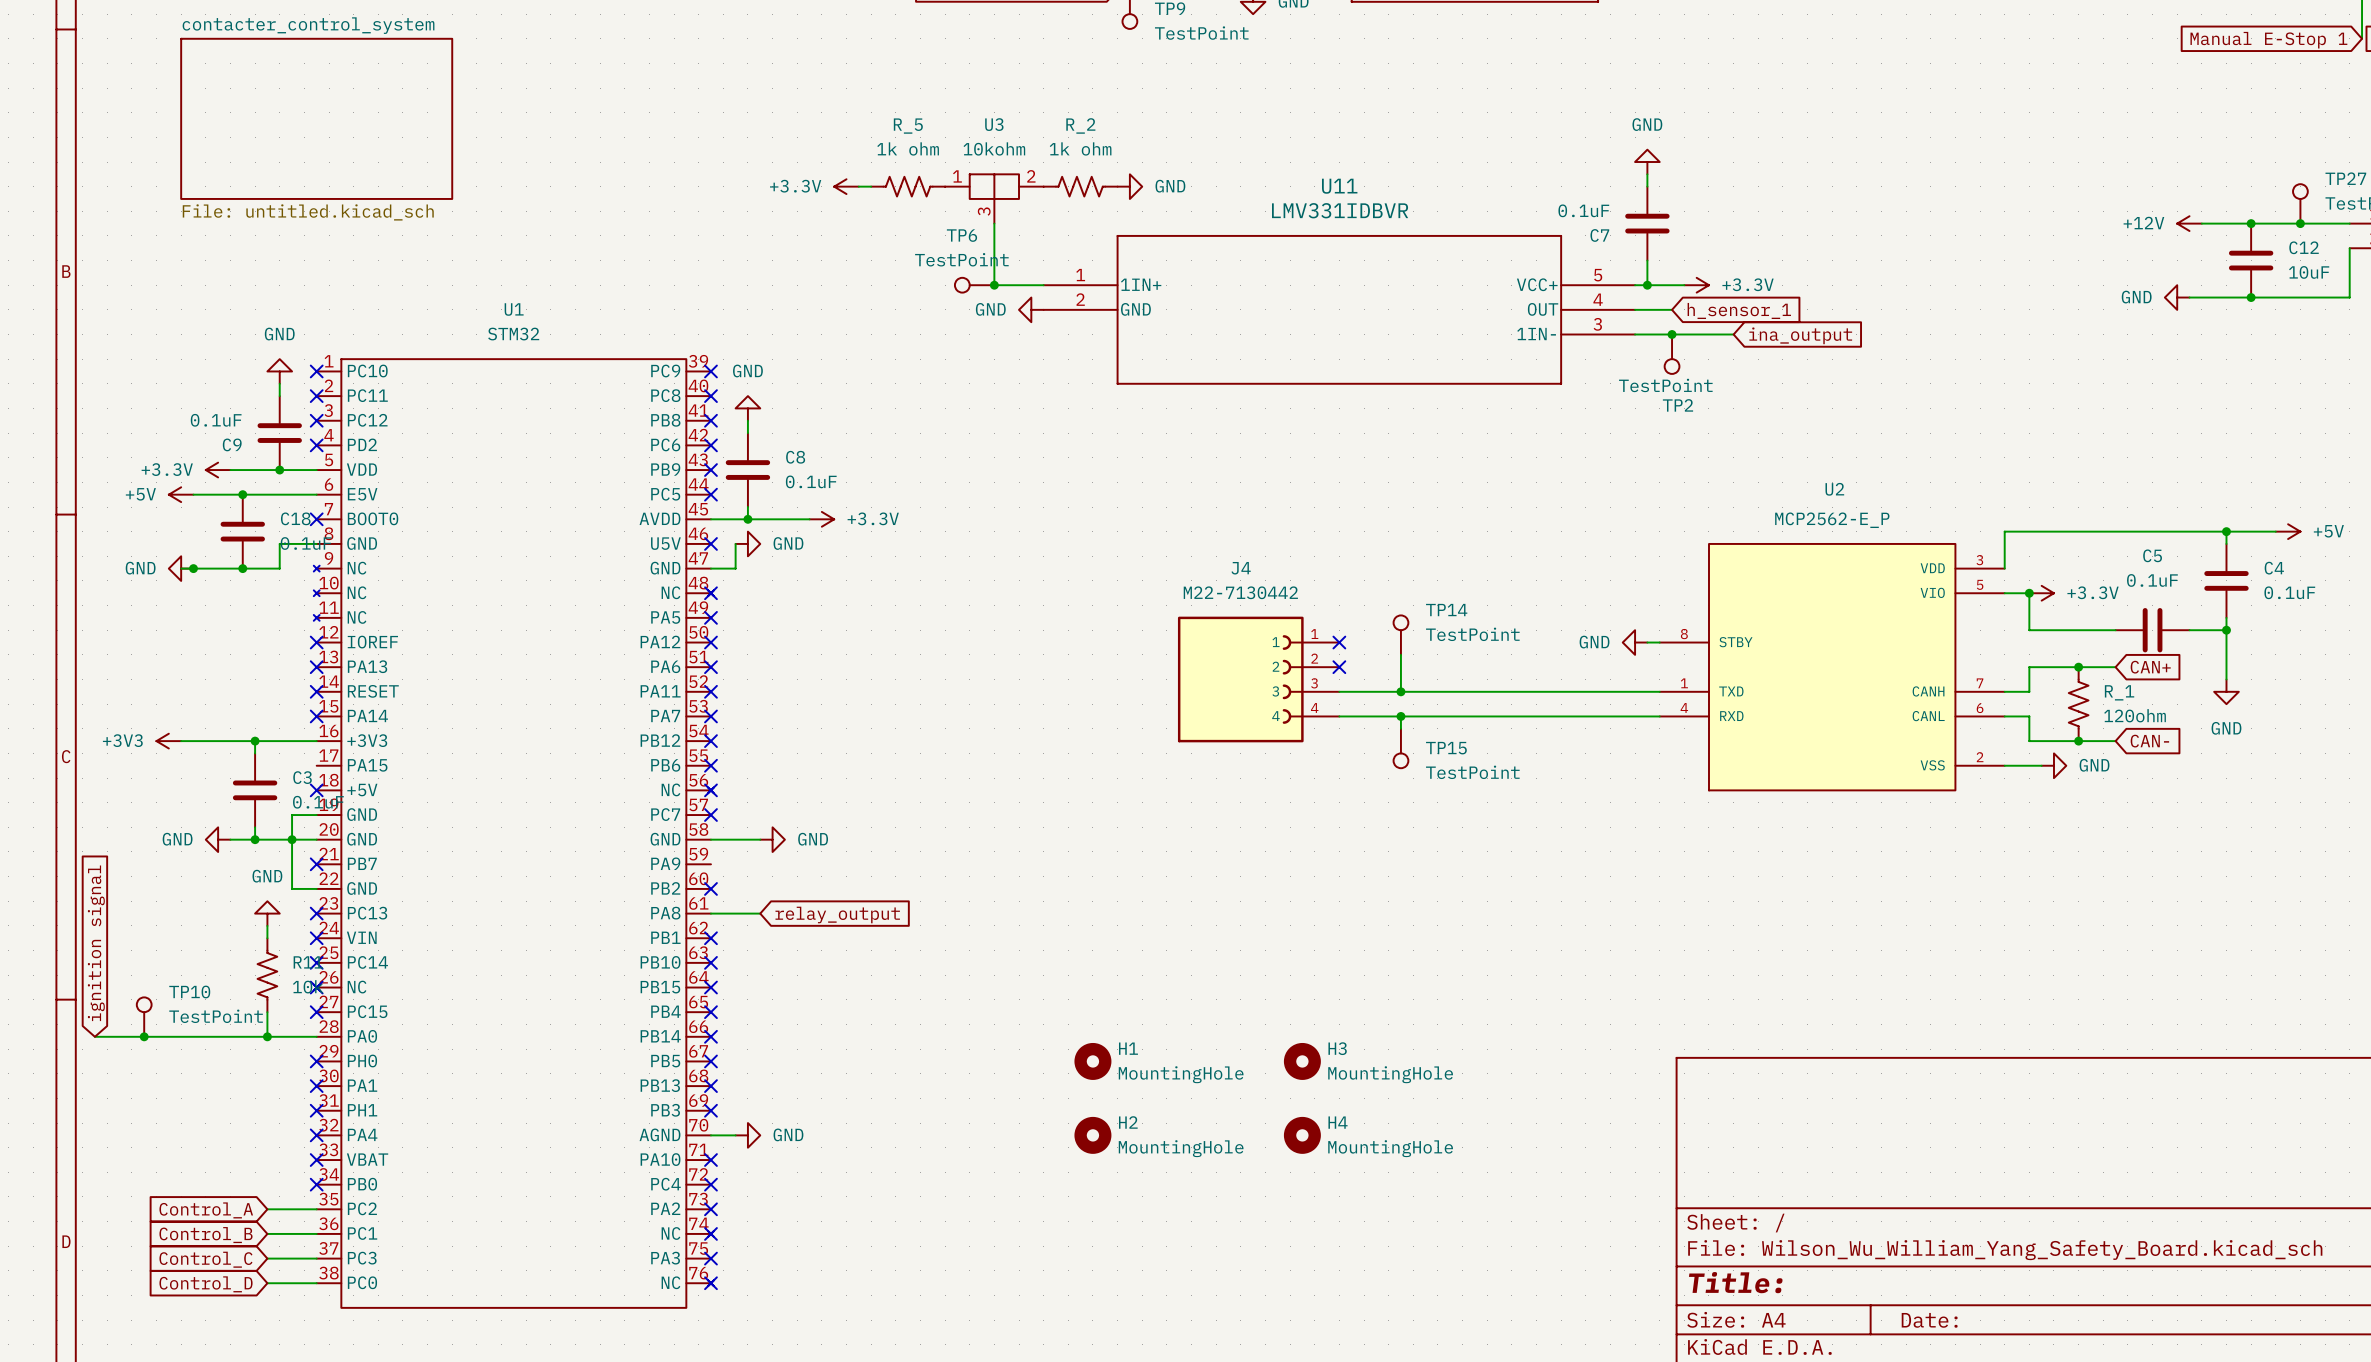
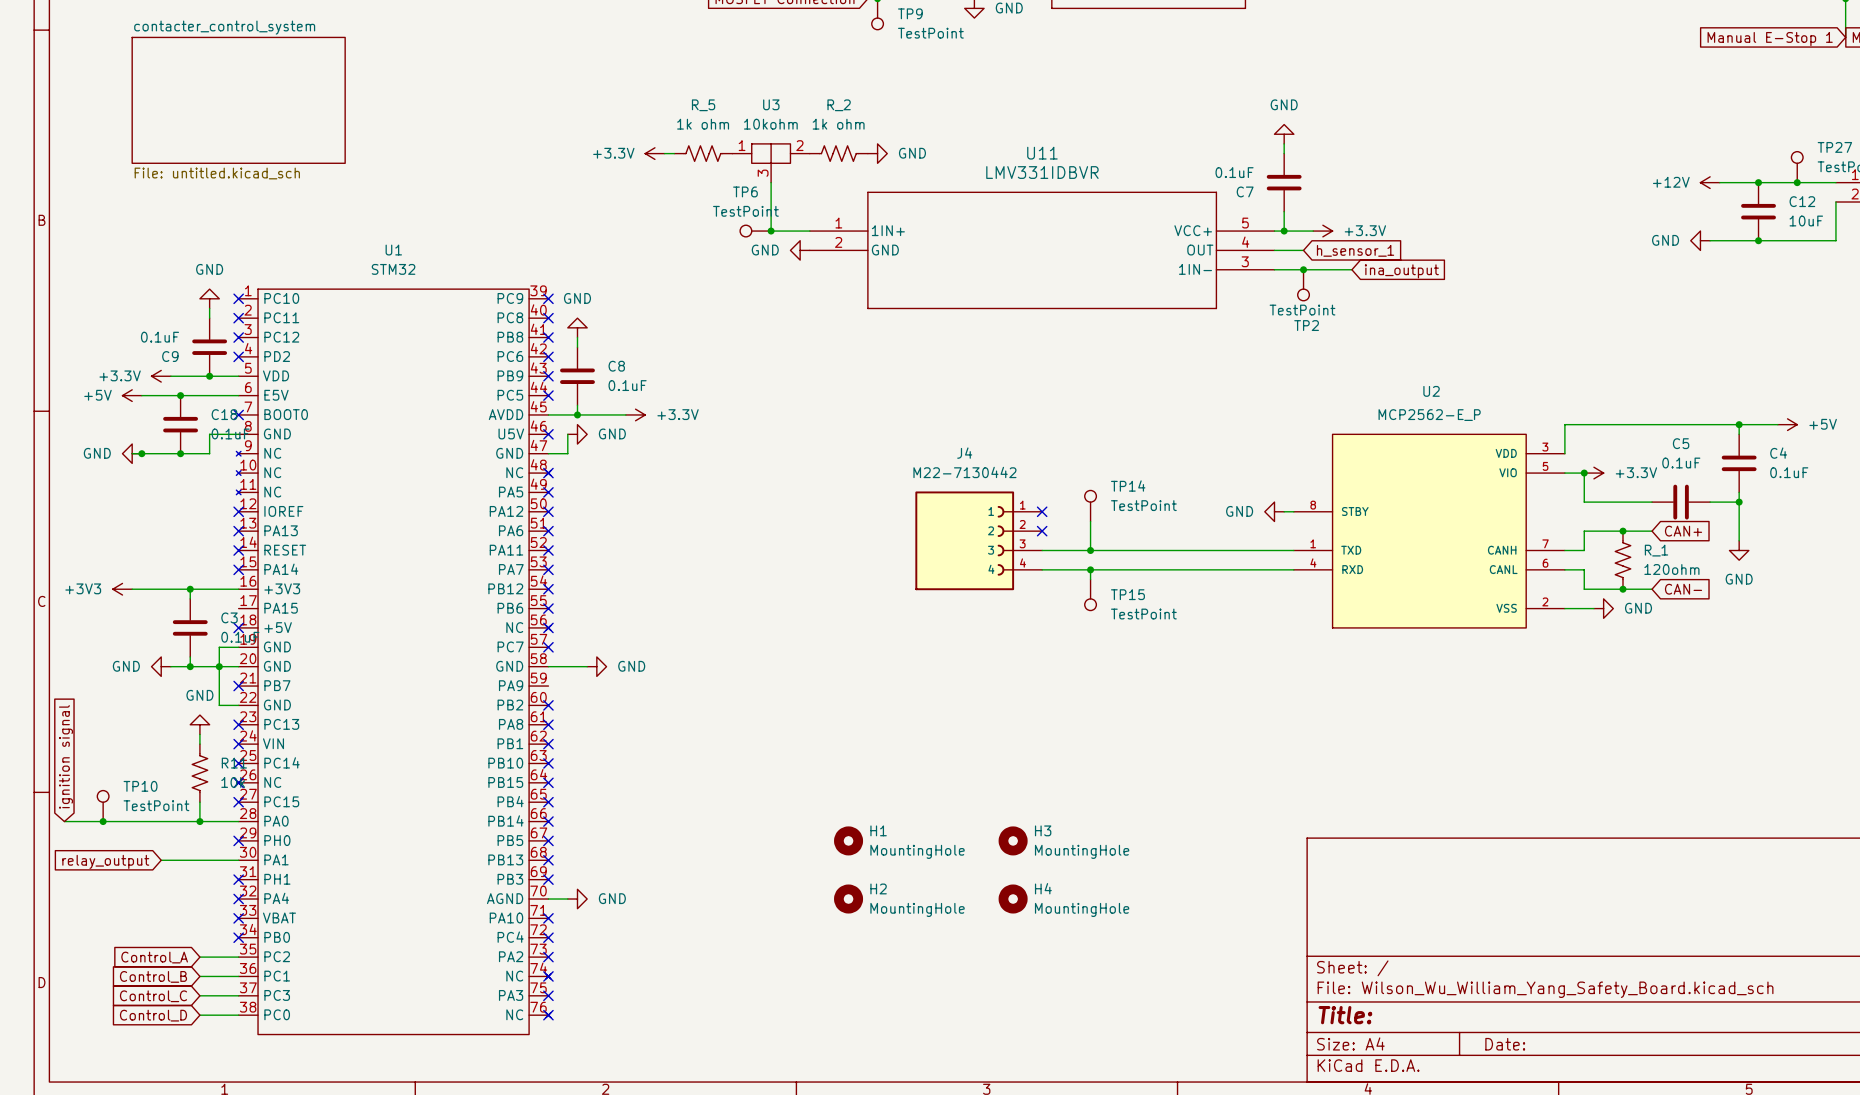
wire: (710, 913) (760, 913) -> none
no-connect mark: none -> (548, 724)
global label: relay_output (837, 914) -> none
wire: none -> (161, 860) (238, 860)
no-connect mark: (316, 1086) -> none
global label: none -> relay_output (105, 861)

